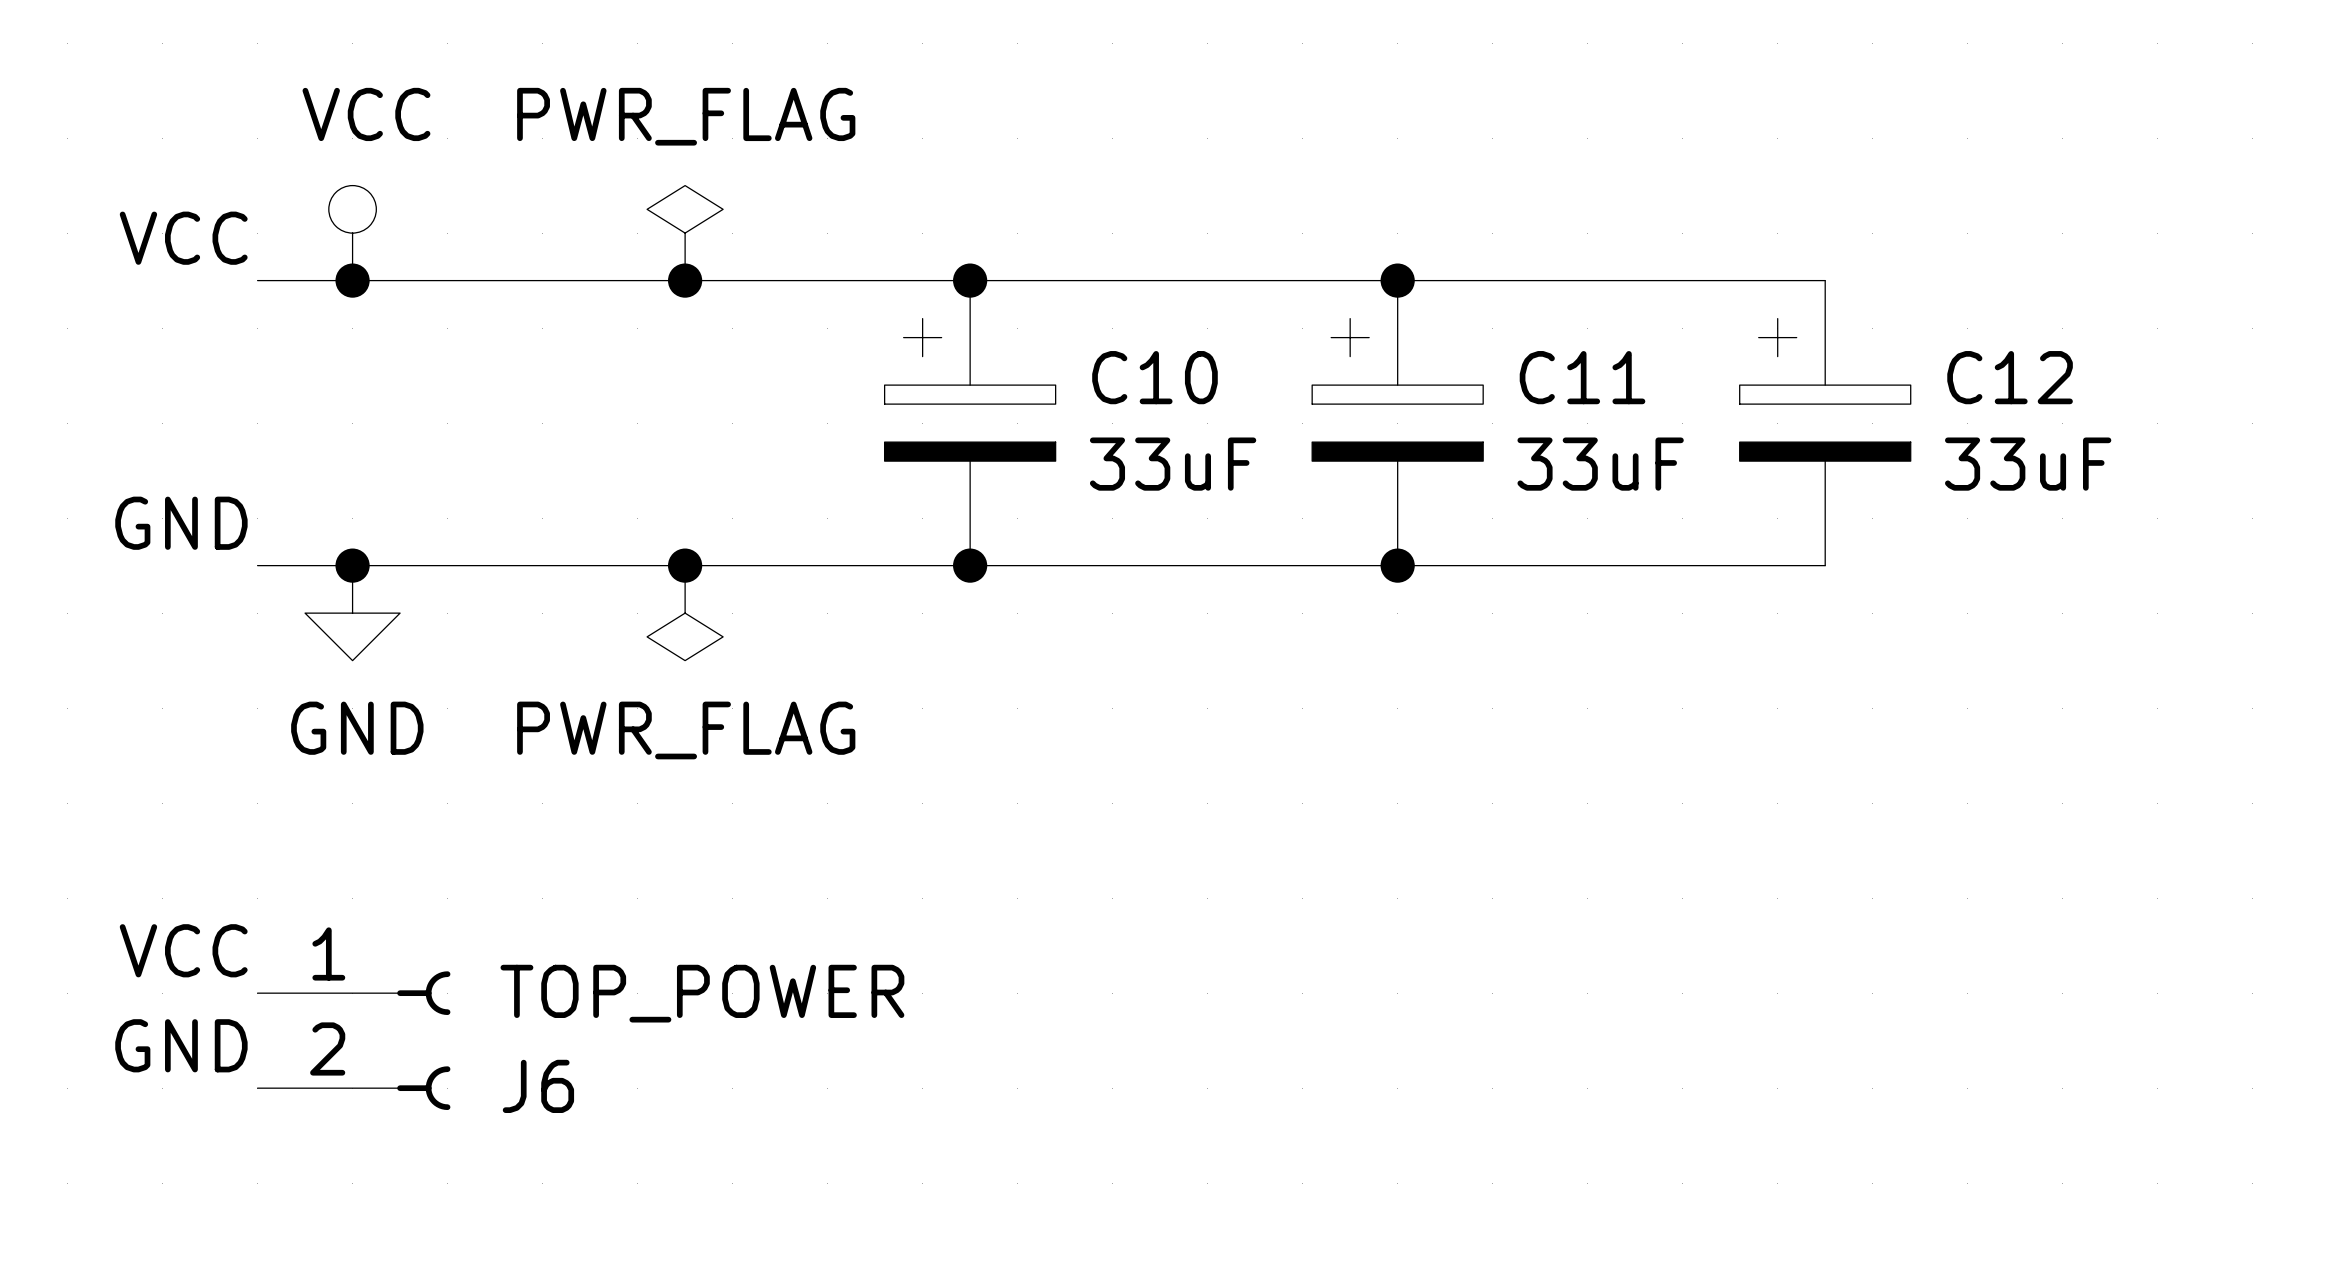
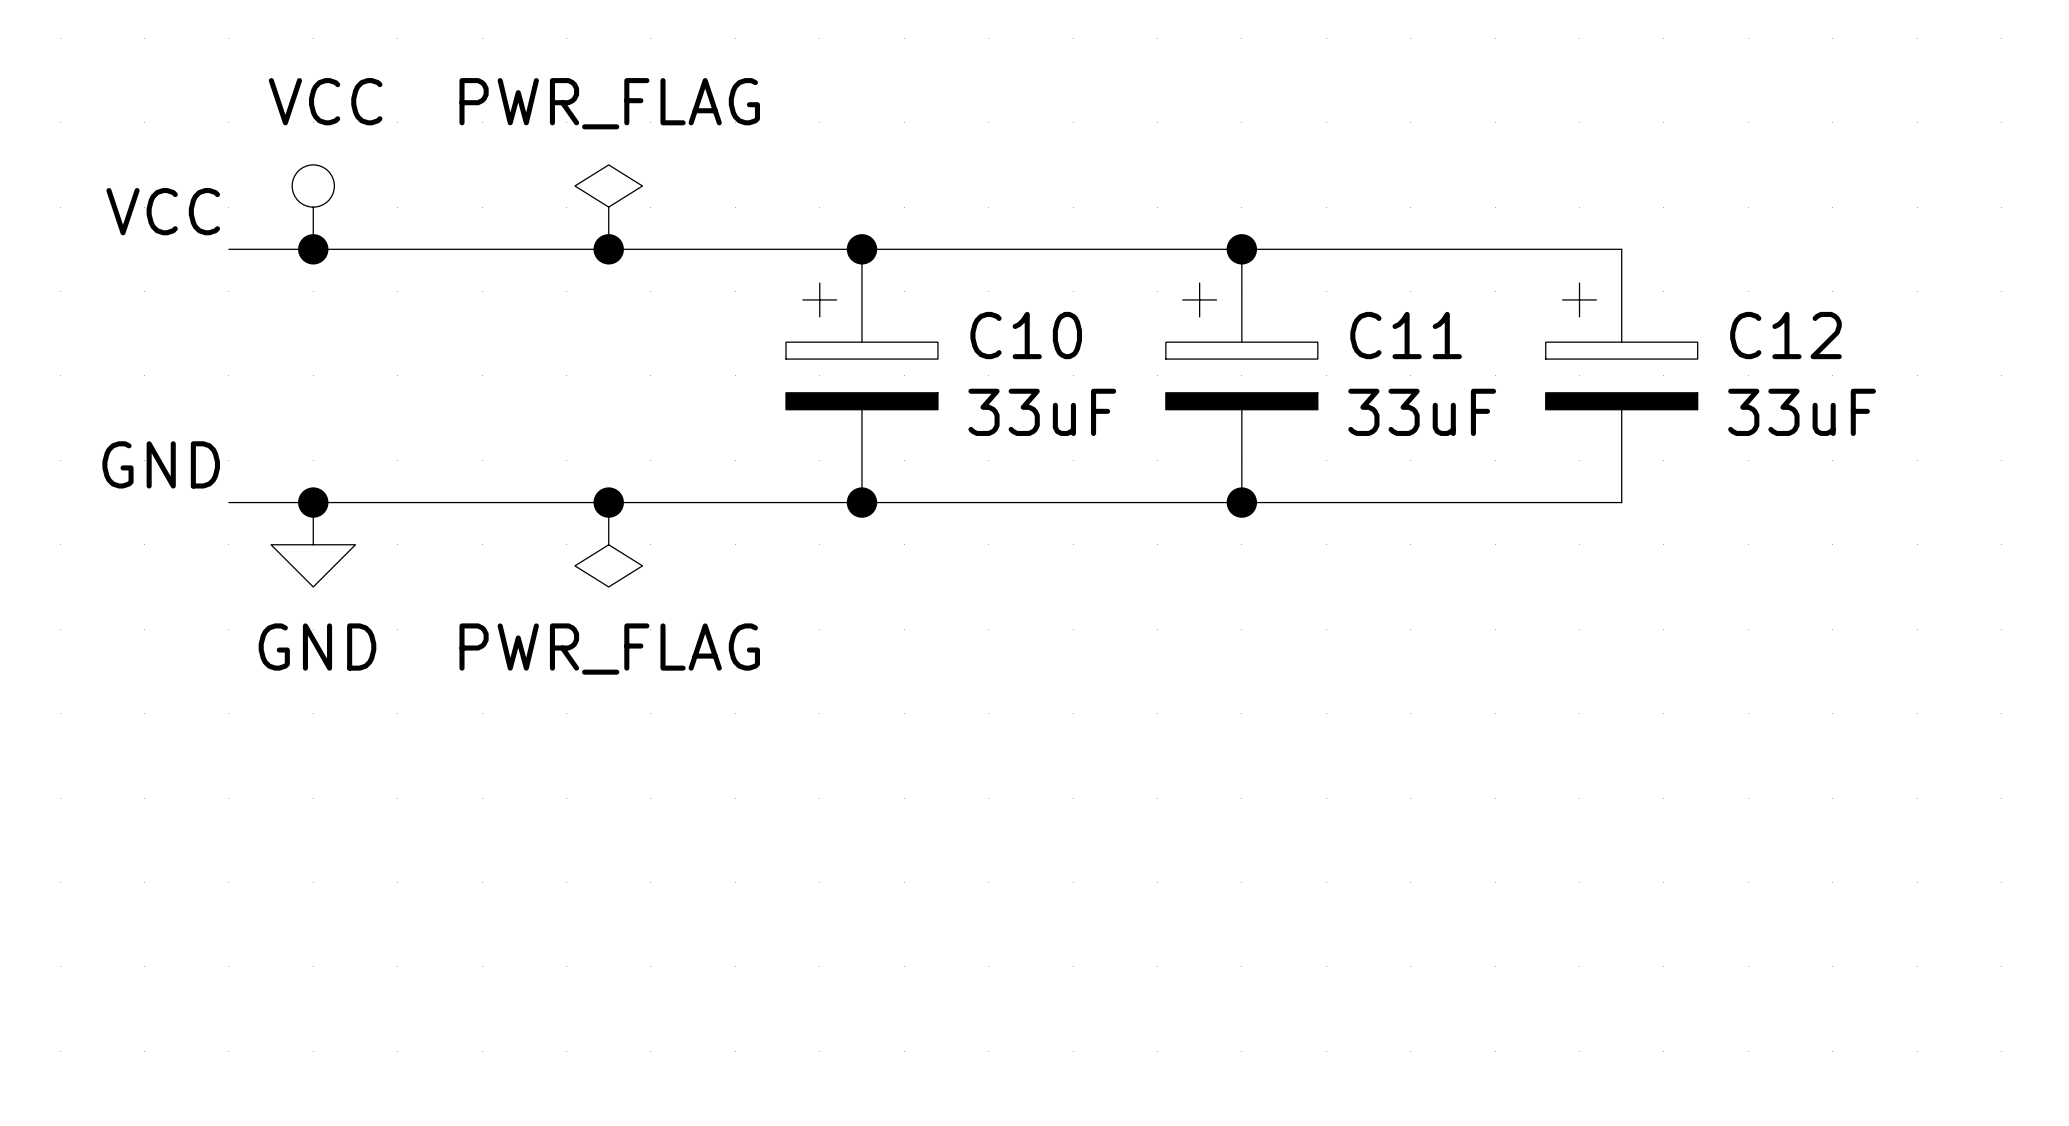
label: VCC (183, 950) -> none
J6: TOP_POWER (353, 1040) -> none
label: GND (181, 1045) -> none

